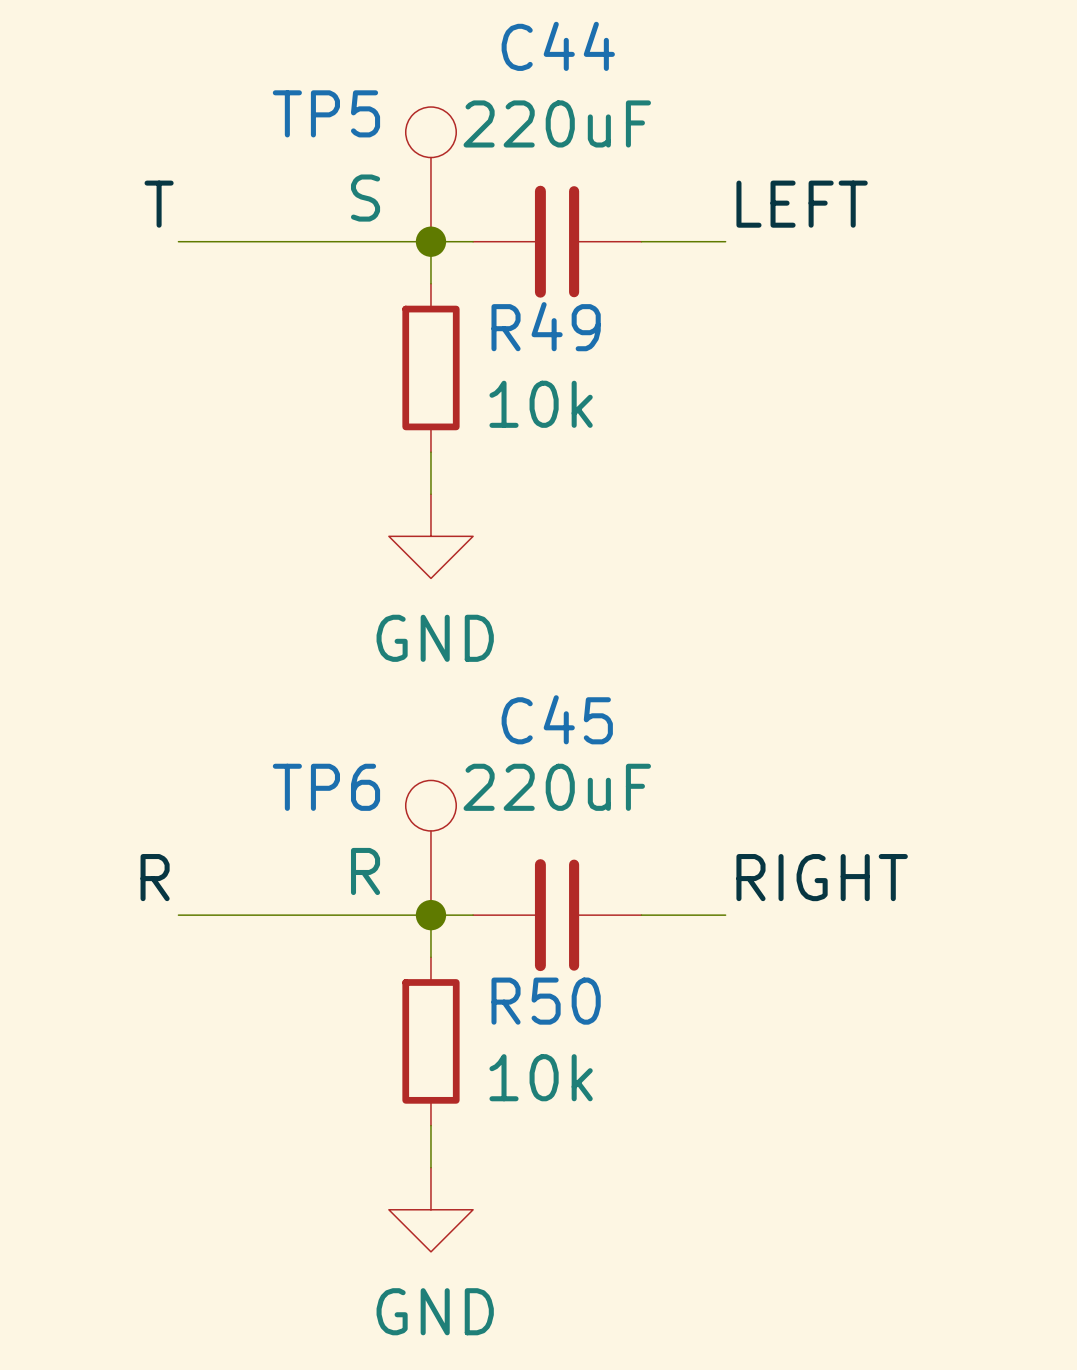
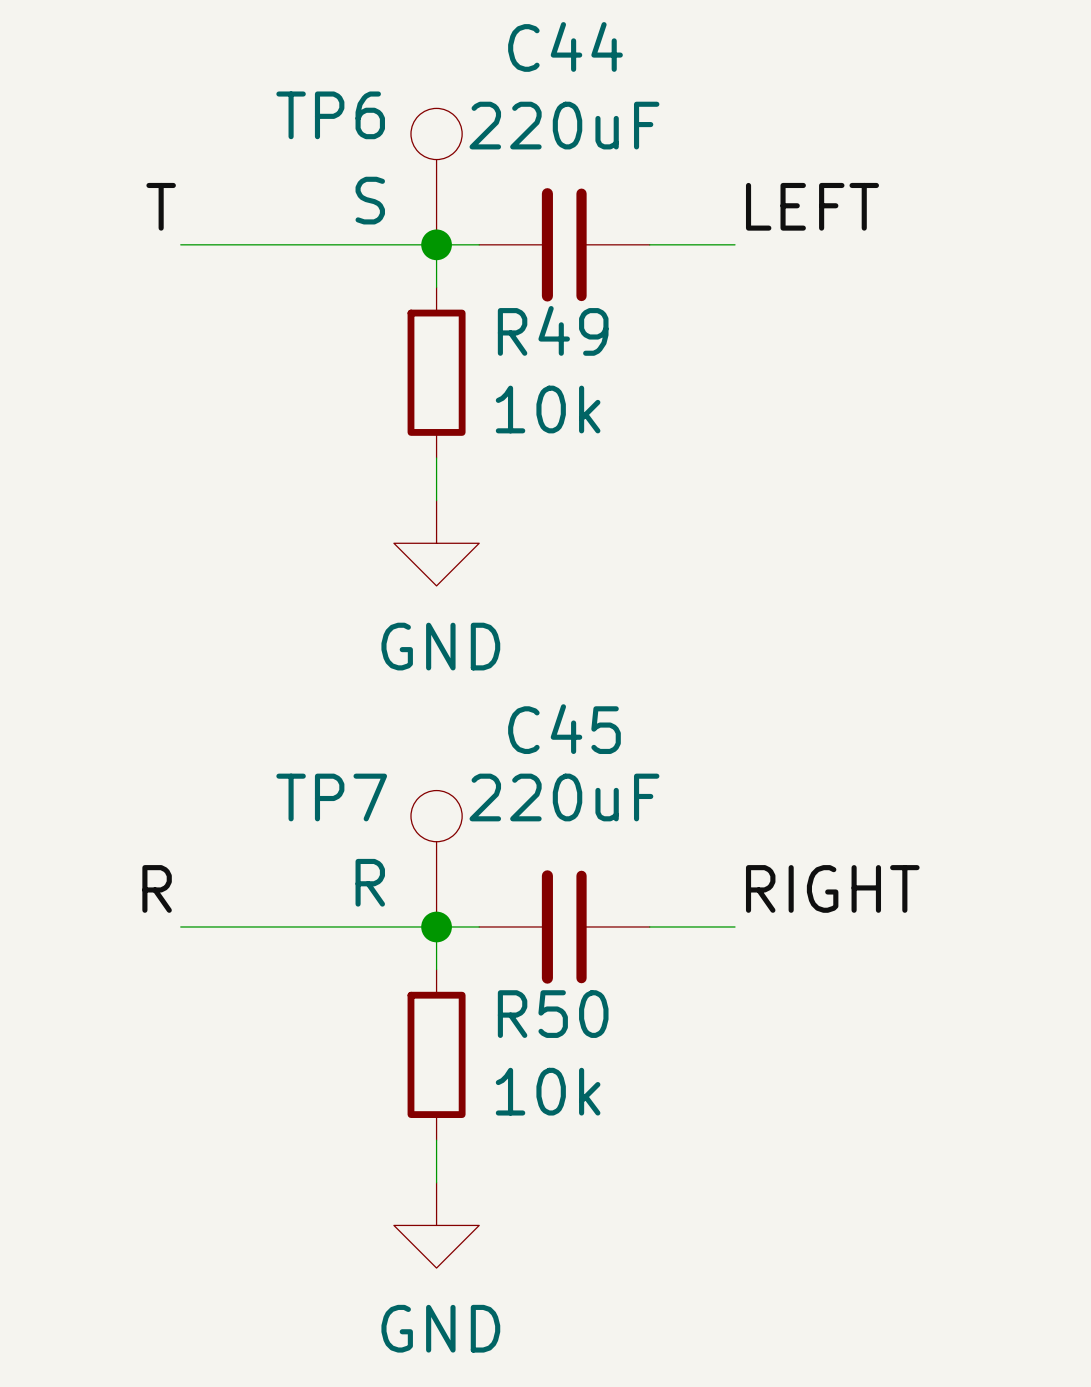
TP5 name: TP5 (326, 113) -> TP6 (330, 115)
TP6 name: TP6 (326, 787) -> TP7 (331, 797)

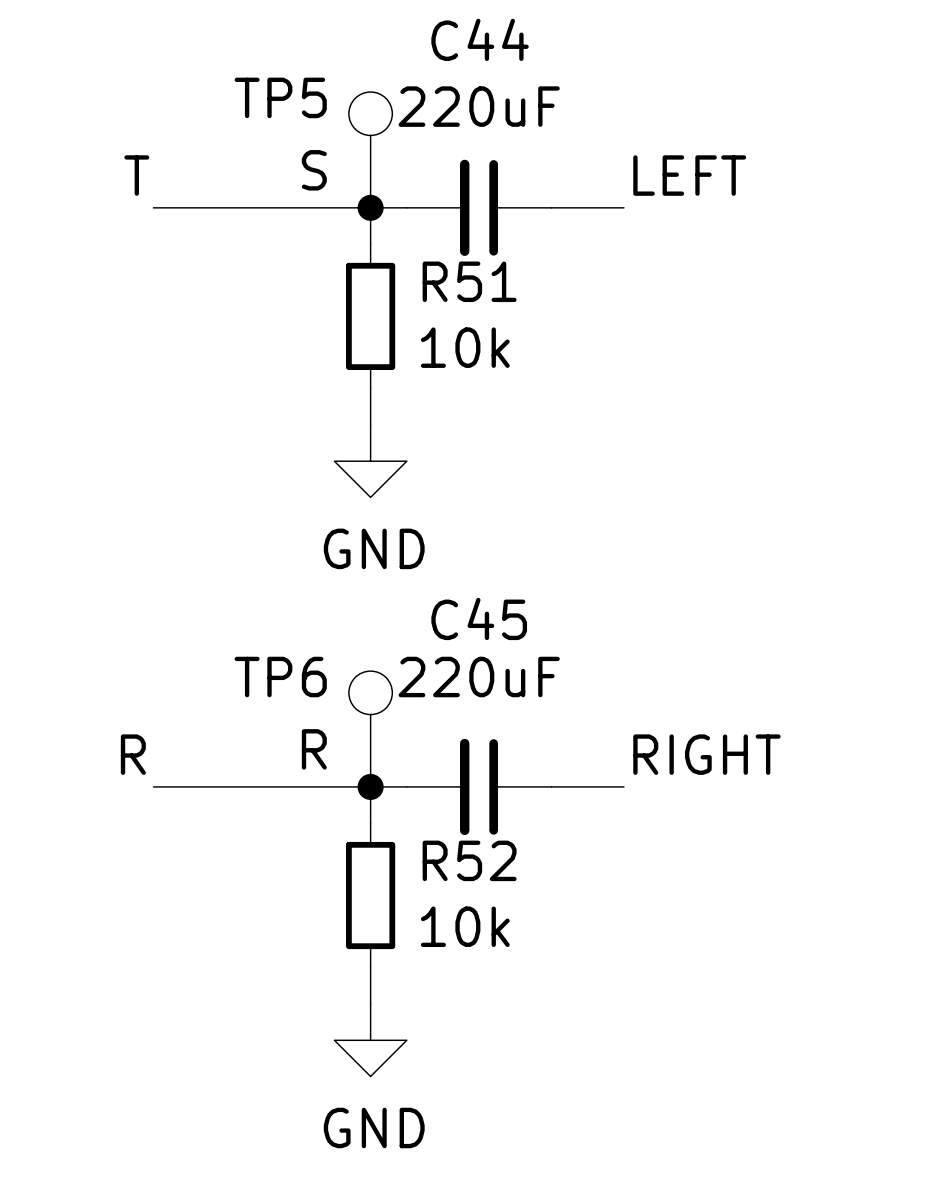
TP6 name: TP6 (330, 115) -> TP5 (280, 97)
R49 name: R49 (553, 330) -> R51 (469, 281)
TP7 name: TP7 (331, 797) -> TP6 (280, 677)
R50 name: R50 (553, 1014) -> R52 (469, 860)

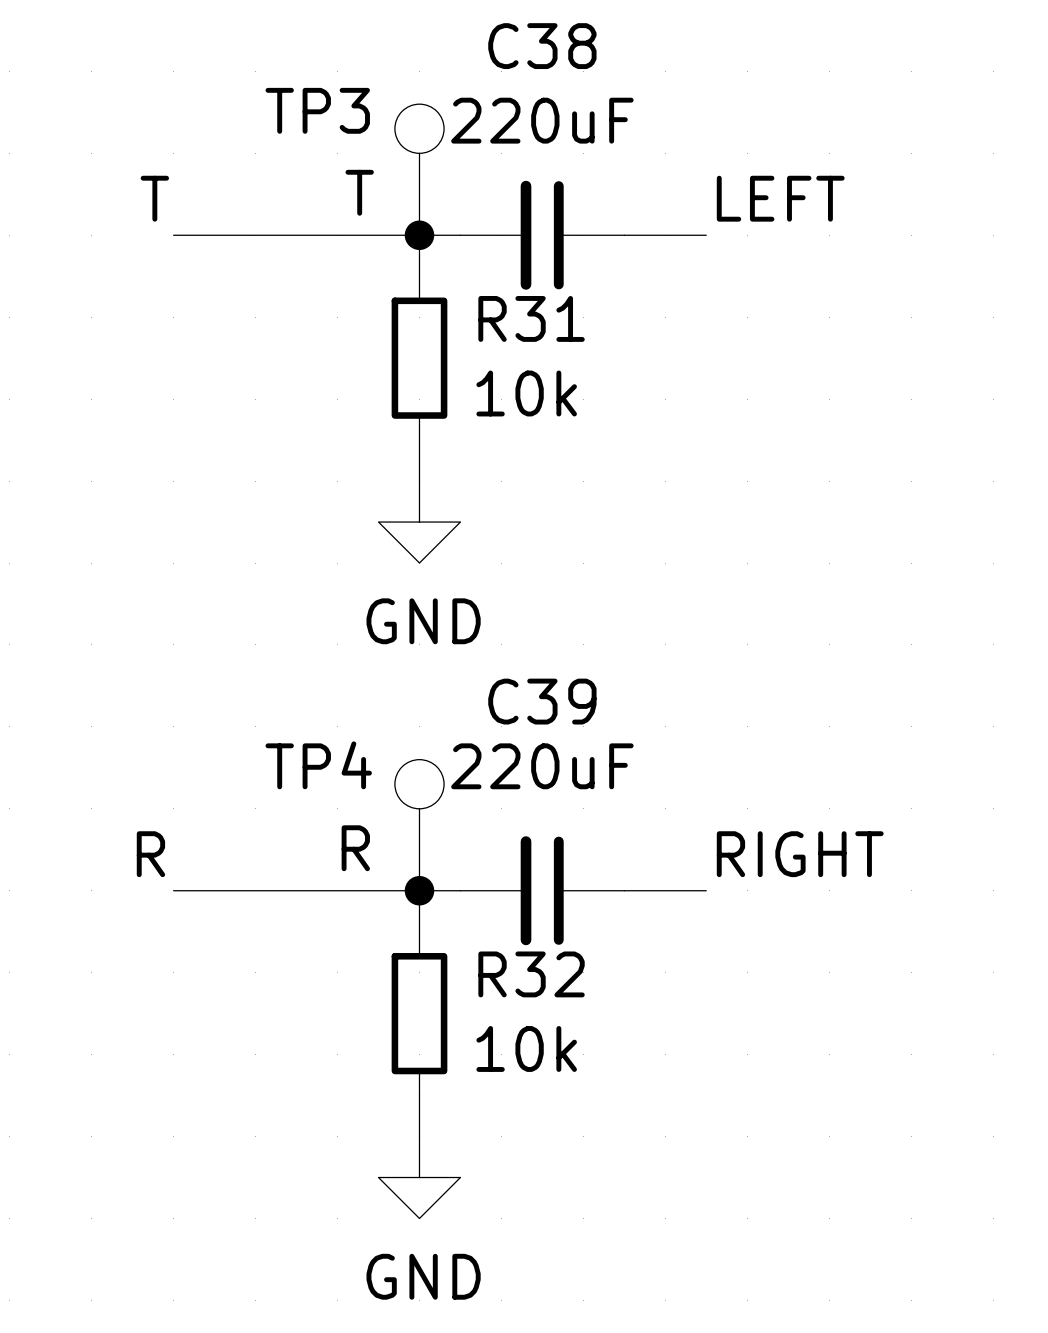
C44 name: C44 (480, 39) -> C38 (542, 46)
TP5 name: TP5 (280, 97) -> TP3 (317, 110)
TP5 value: S (314, 170) -> T (359, 192)
R51 name: R51 (469, 281) -> R31 (531, 318)
C45 name: C45 (479, 618) -> C39 (542, 701)
TP6 name: TP6 (280, 677) -> TP4 (318, 765)
R52 name: R52 (469, 860) -> R32 (531, 974)

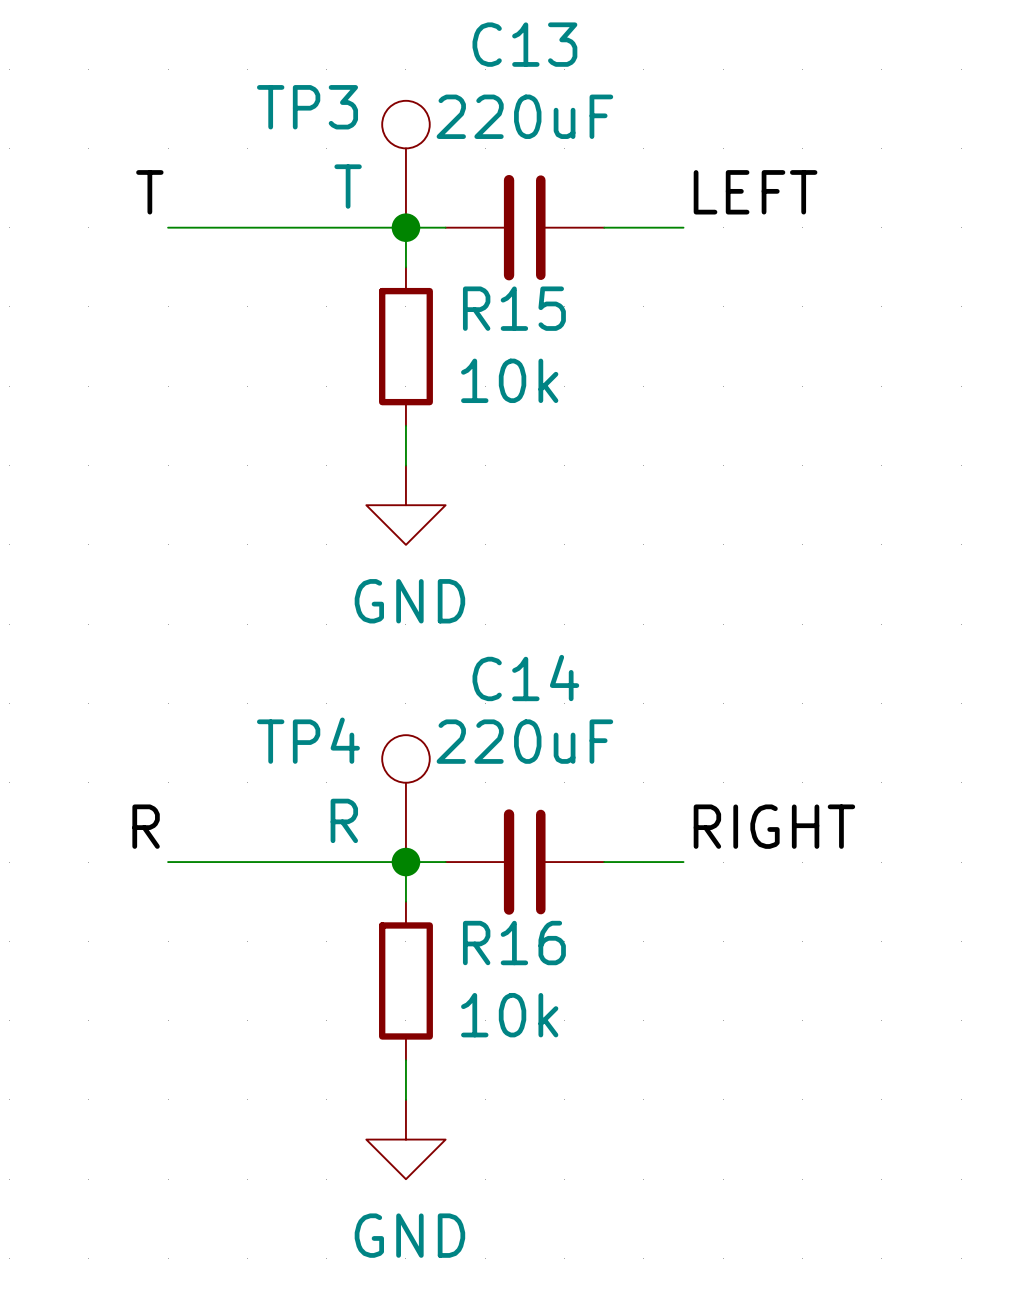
C38 name: C38 (542, 46) -> C13 (524, 44)
R31 name: R31 (531, 318) -> R15 (514, 308)
C39 name: C39 (542, 701) -> C14 (525, 678)
R32 name: R32 (531, 974) -> R16 (514, 943)

